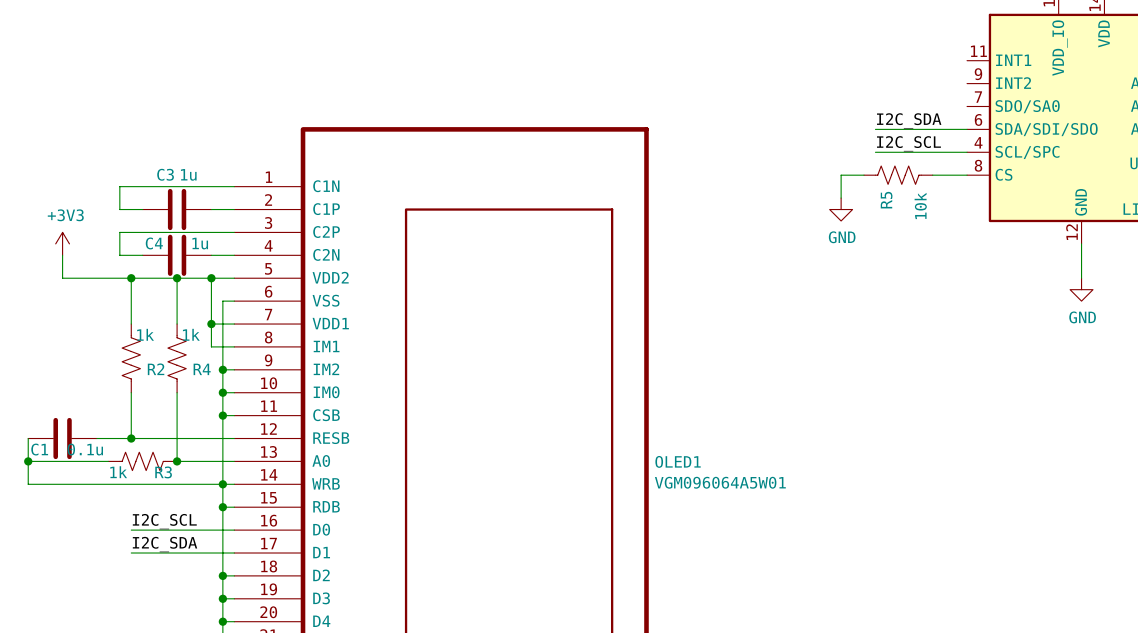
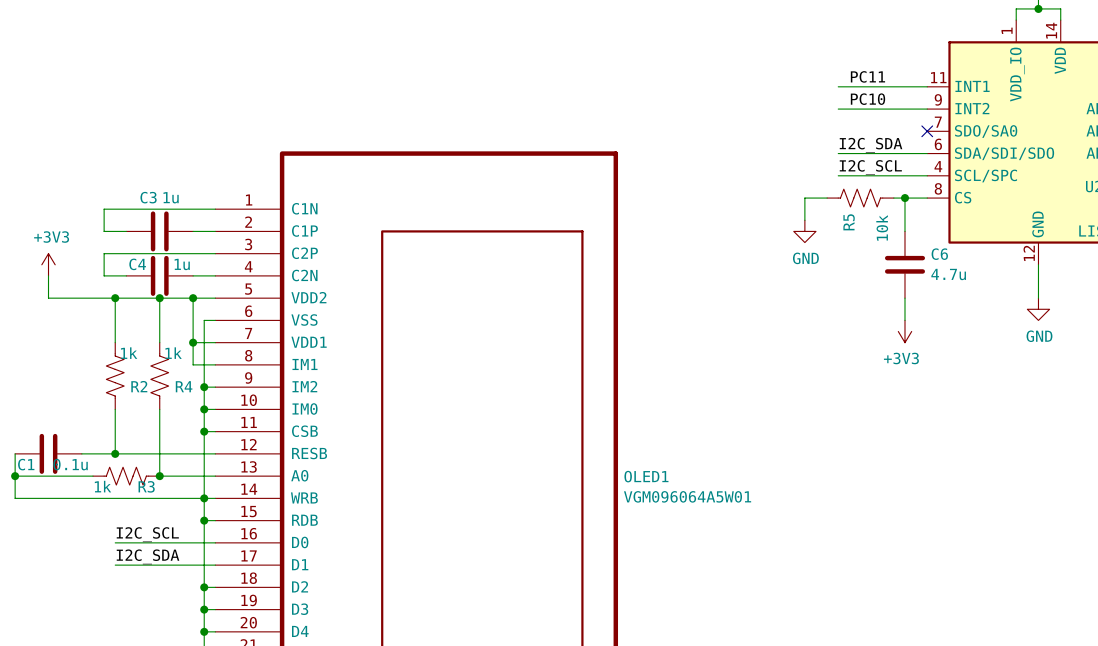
label: none -> PC11 (867, 76)
wire: none -> (838, 86) (927, 86)
label: none -> PC10 (867, 99)
wire: none -> (838, 109) (927, 109)
no-connect mark: none -> (927, 131)
wire: none -> (904, 198) (904, 231)
junction: none -> (904, 198)
C6: none -> 4.7u (904, 264)
wire: none -> (904, 298) (904, 320)
power symbol: none -> +3V3 (904, 331)

